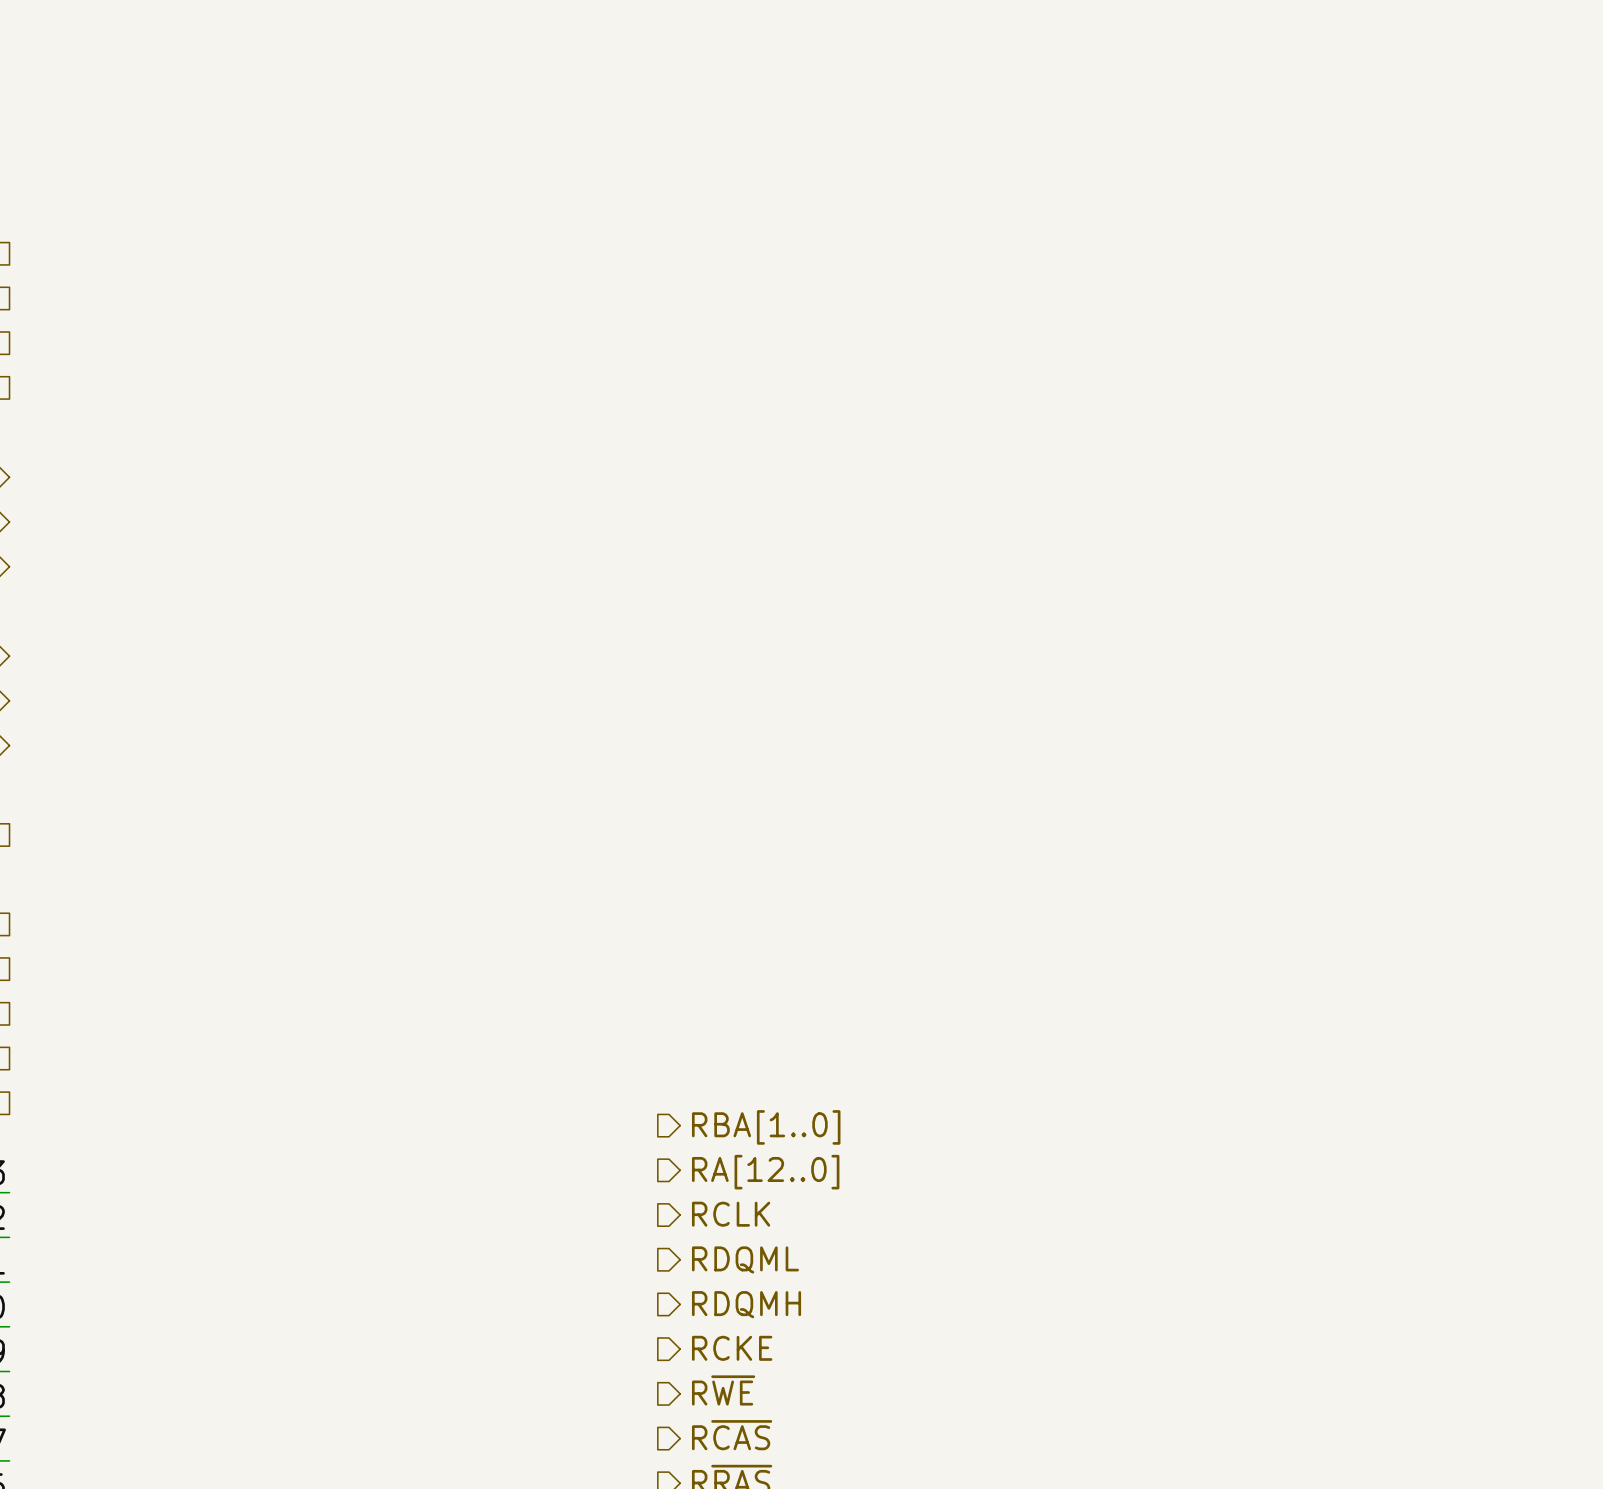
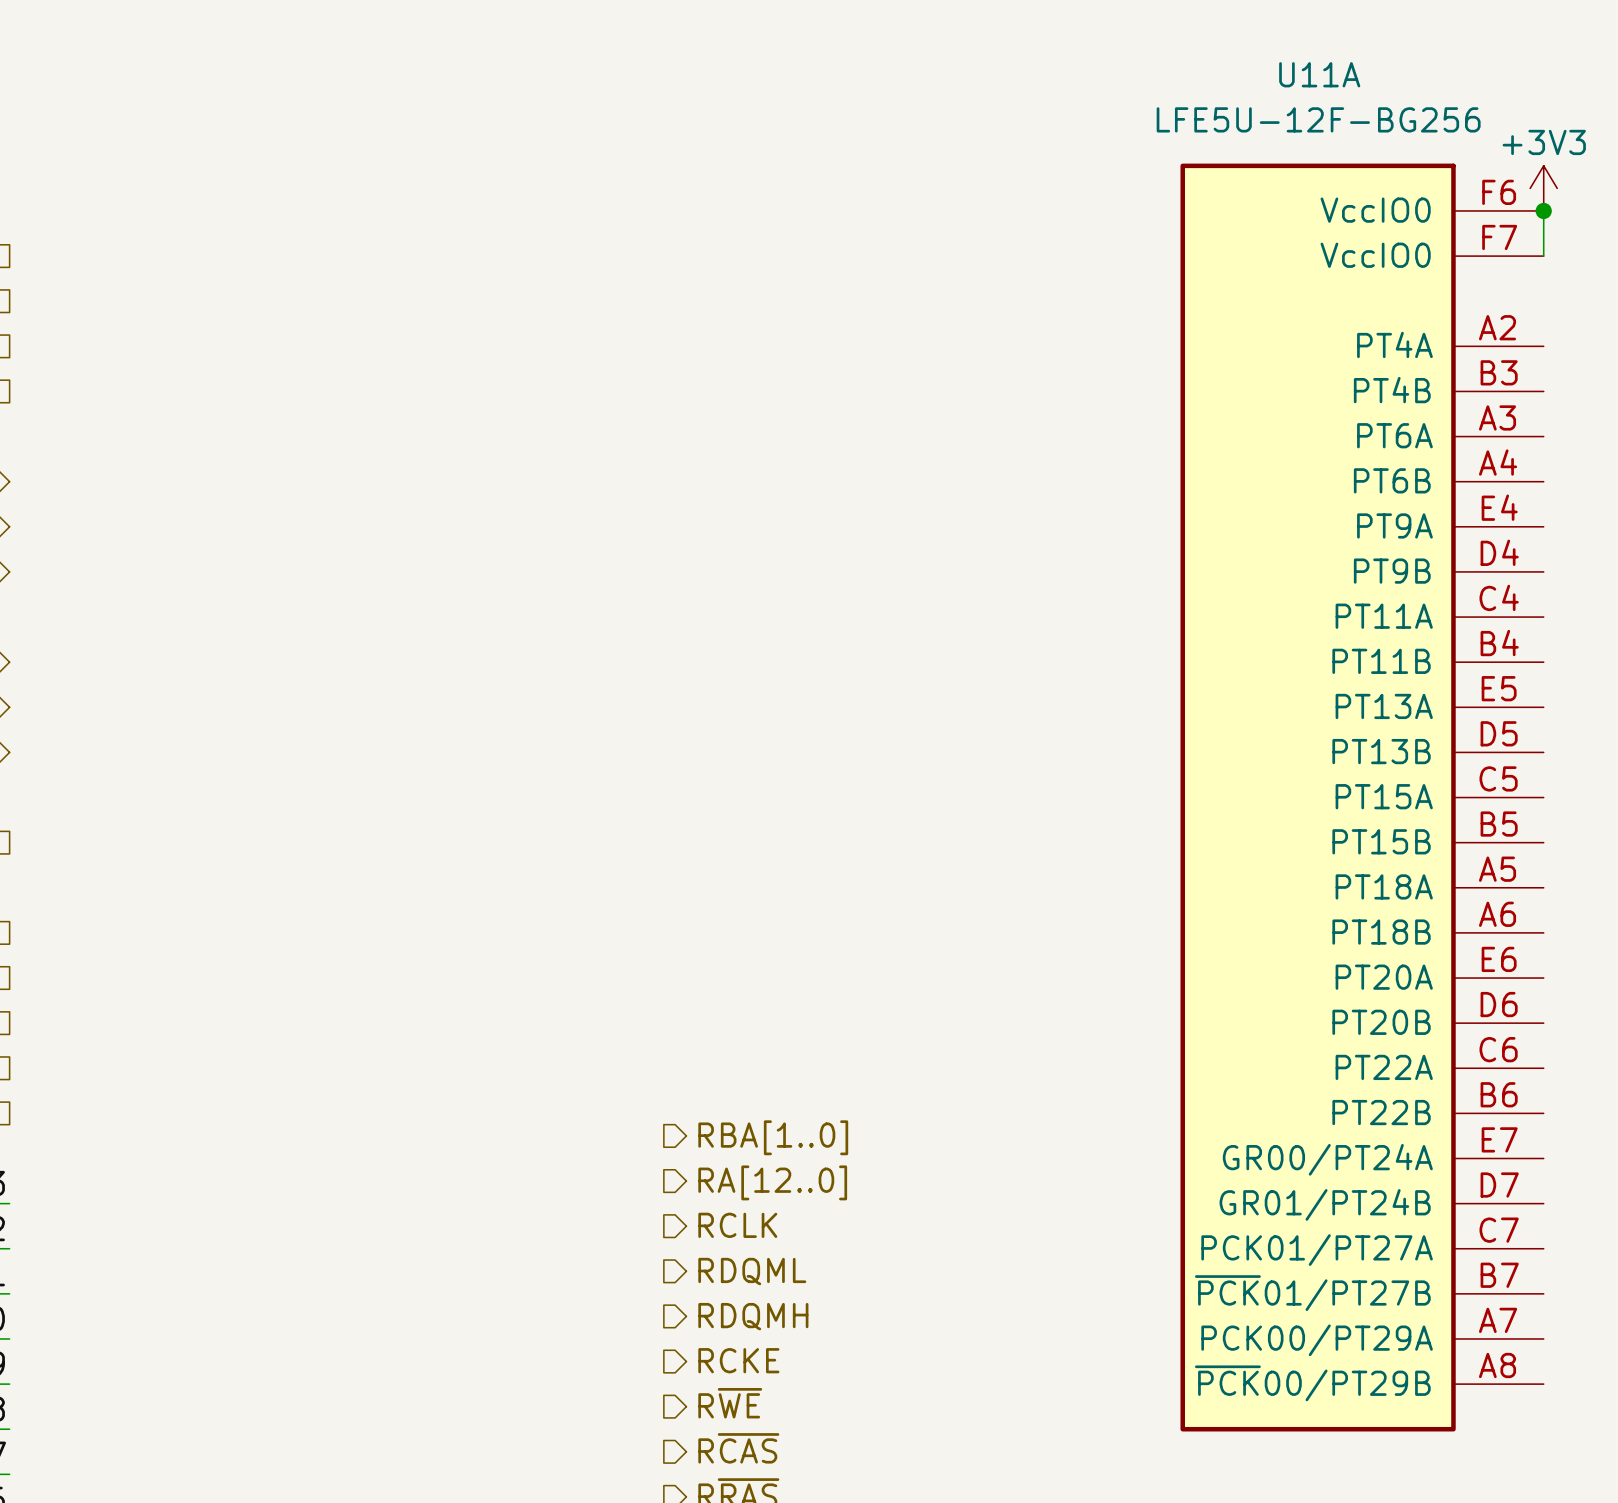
power symbol: none -> +3V3 (1543, 188)
wire: none -> (1543, 210) (1543, 256)
junction: none -> (1543, 210)
U11A: none -> LFE5U-12F-BG256 (1362, 797)

